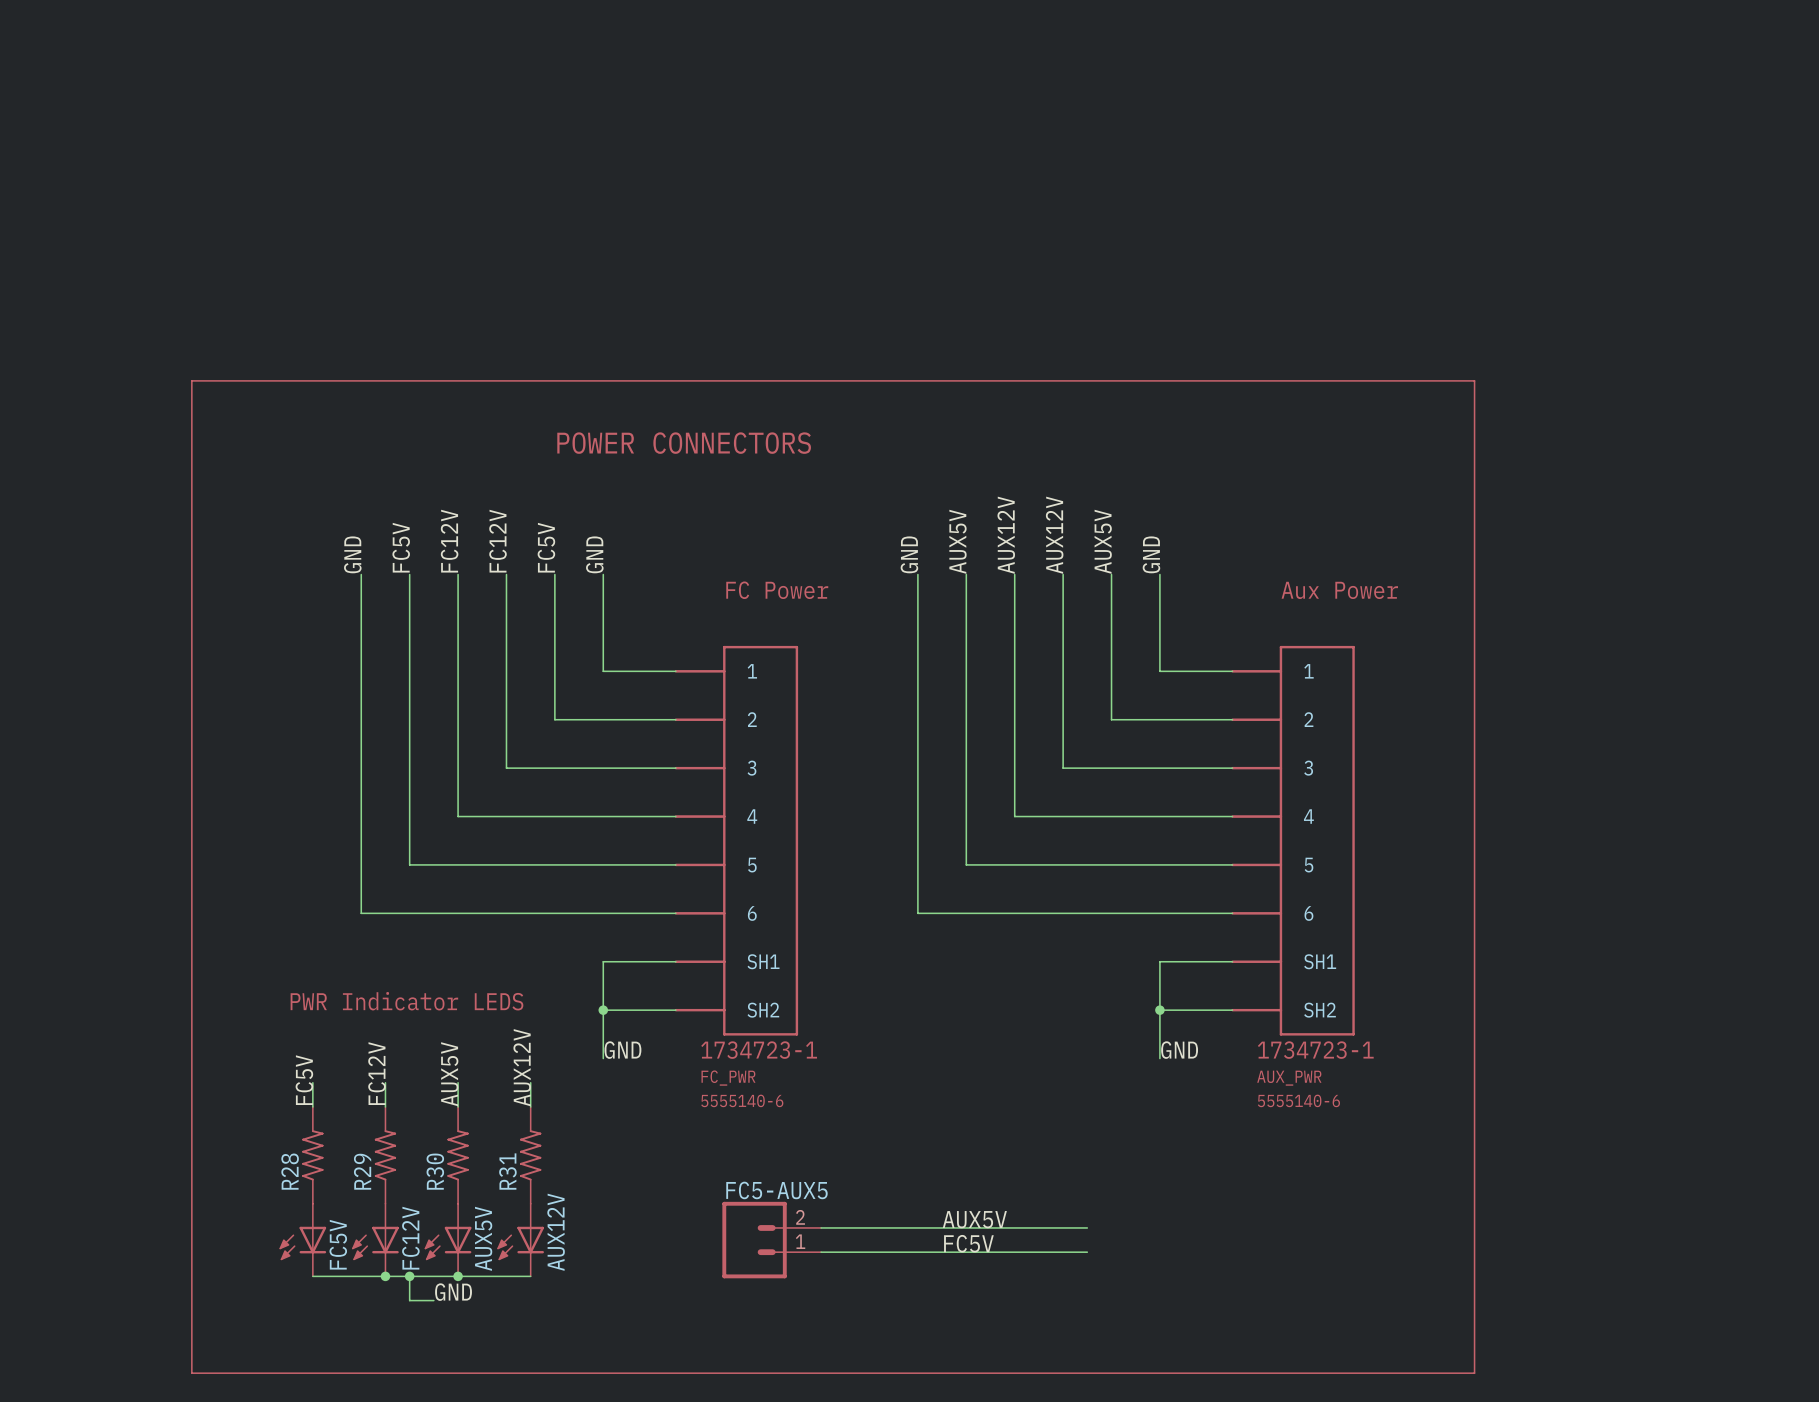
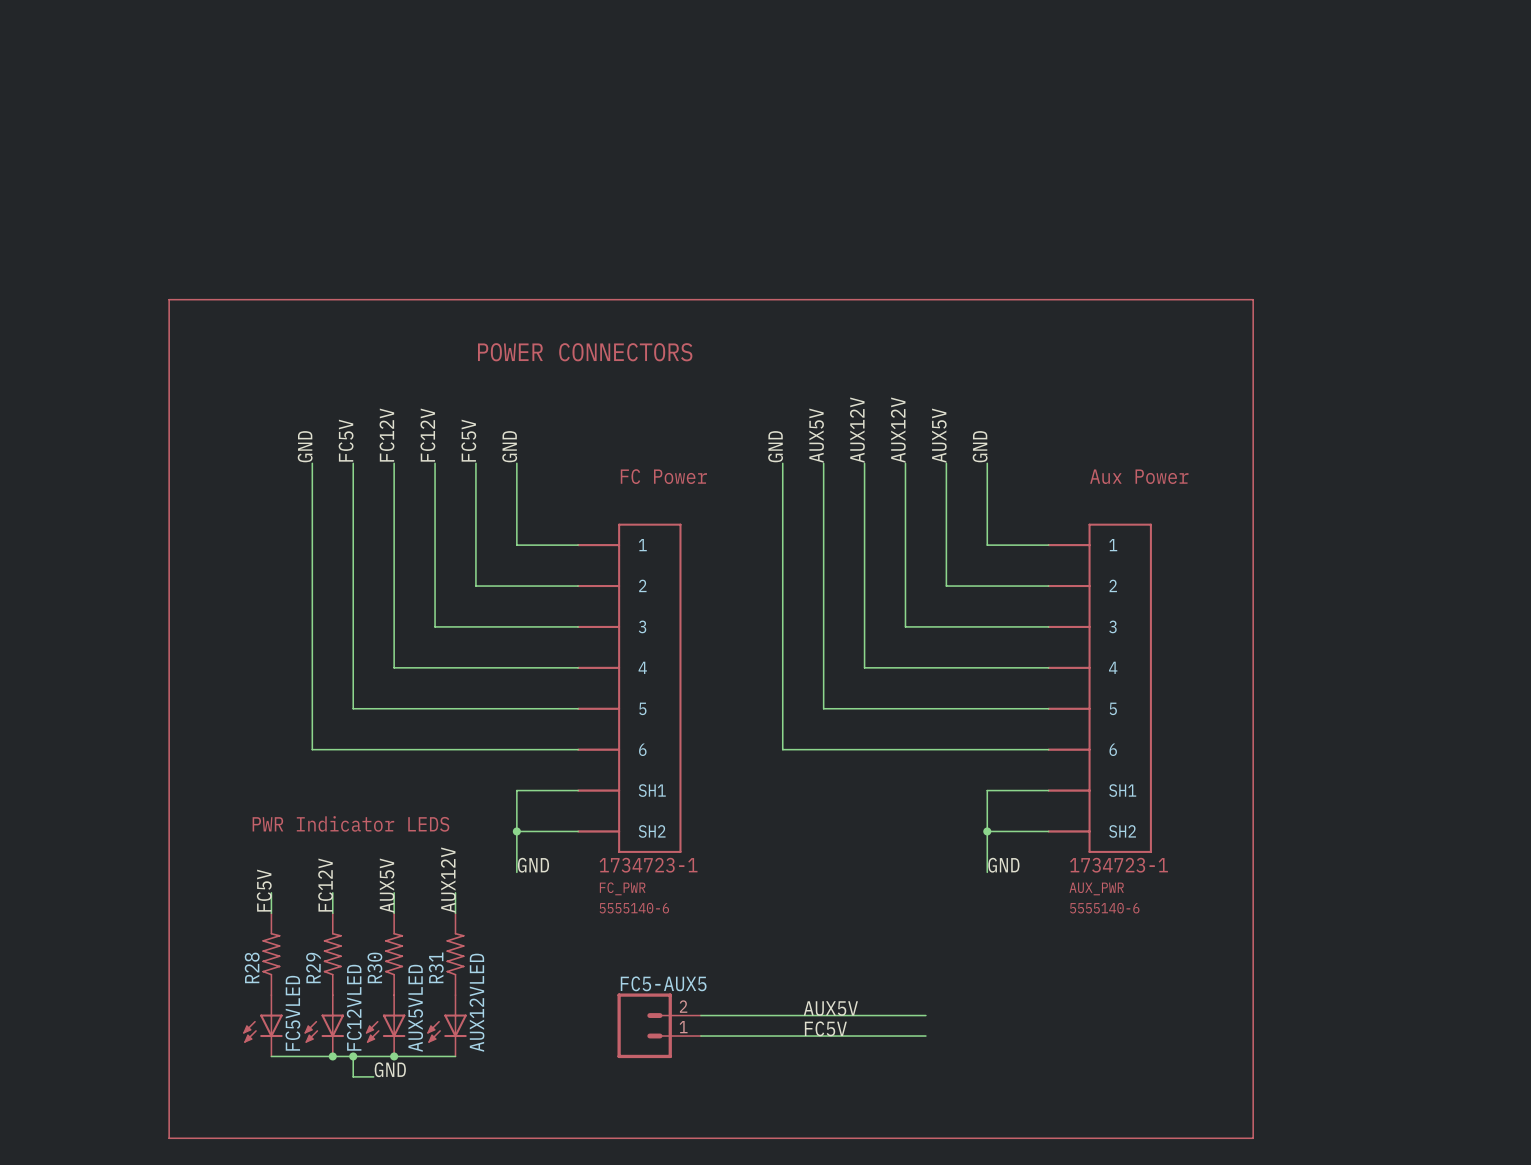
AUX12V name: AUX12V (556, 1232) -> AUX12VLED (476, 1002)
FC12V name: FC12V (410, 1238) -> FC12VLED (354, 1007)
AUX5V name: AUX5V (483, 1238) -> AUX5VLED (415, 1008)
FC5V name: FC5V (338, 1244) -> FC5VLED (292, 1013)

